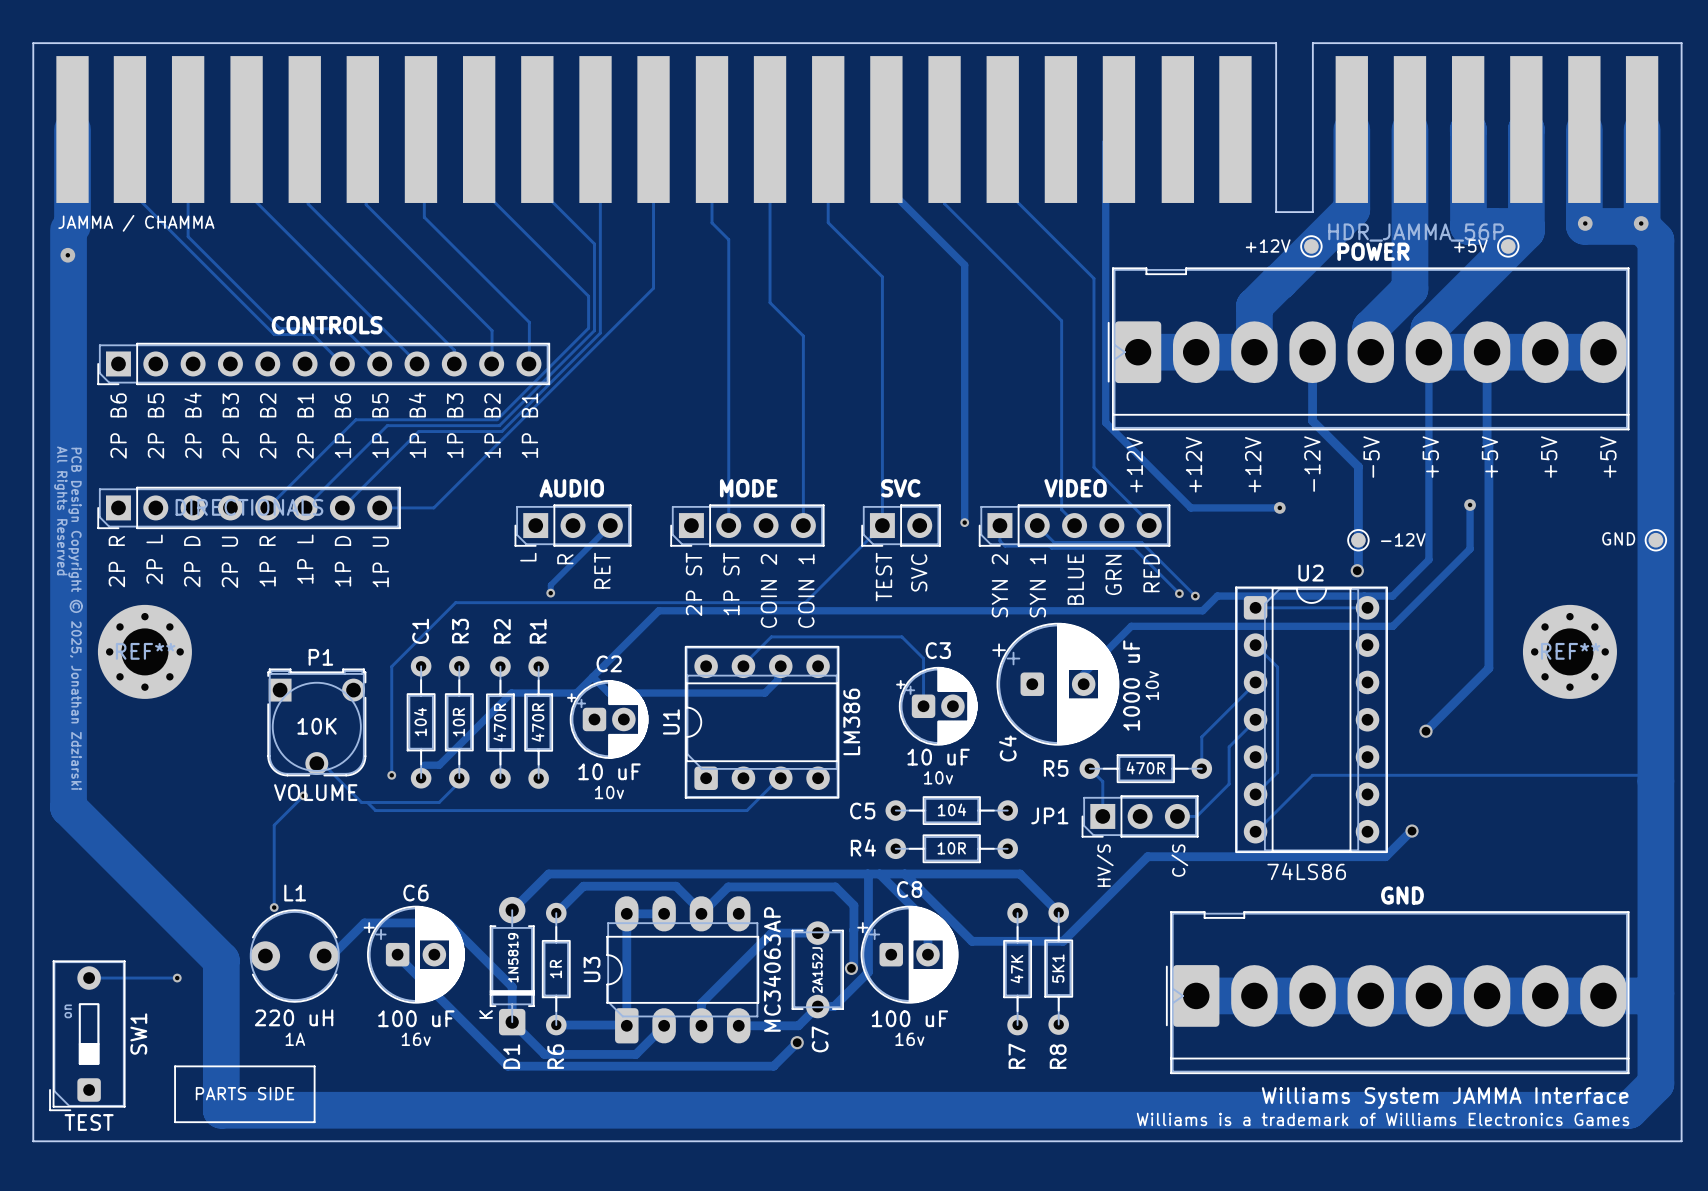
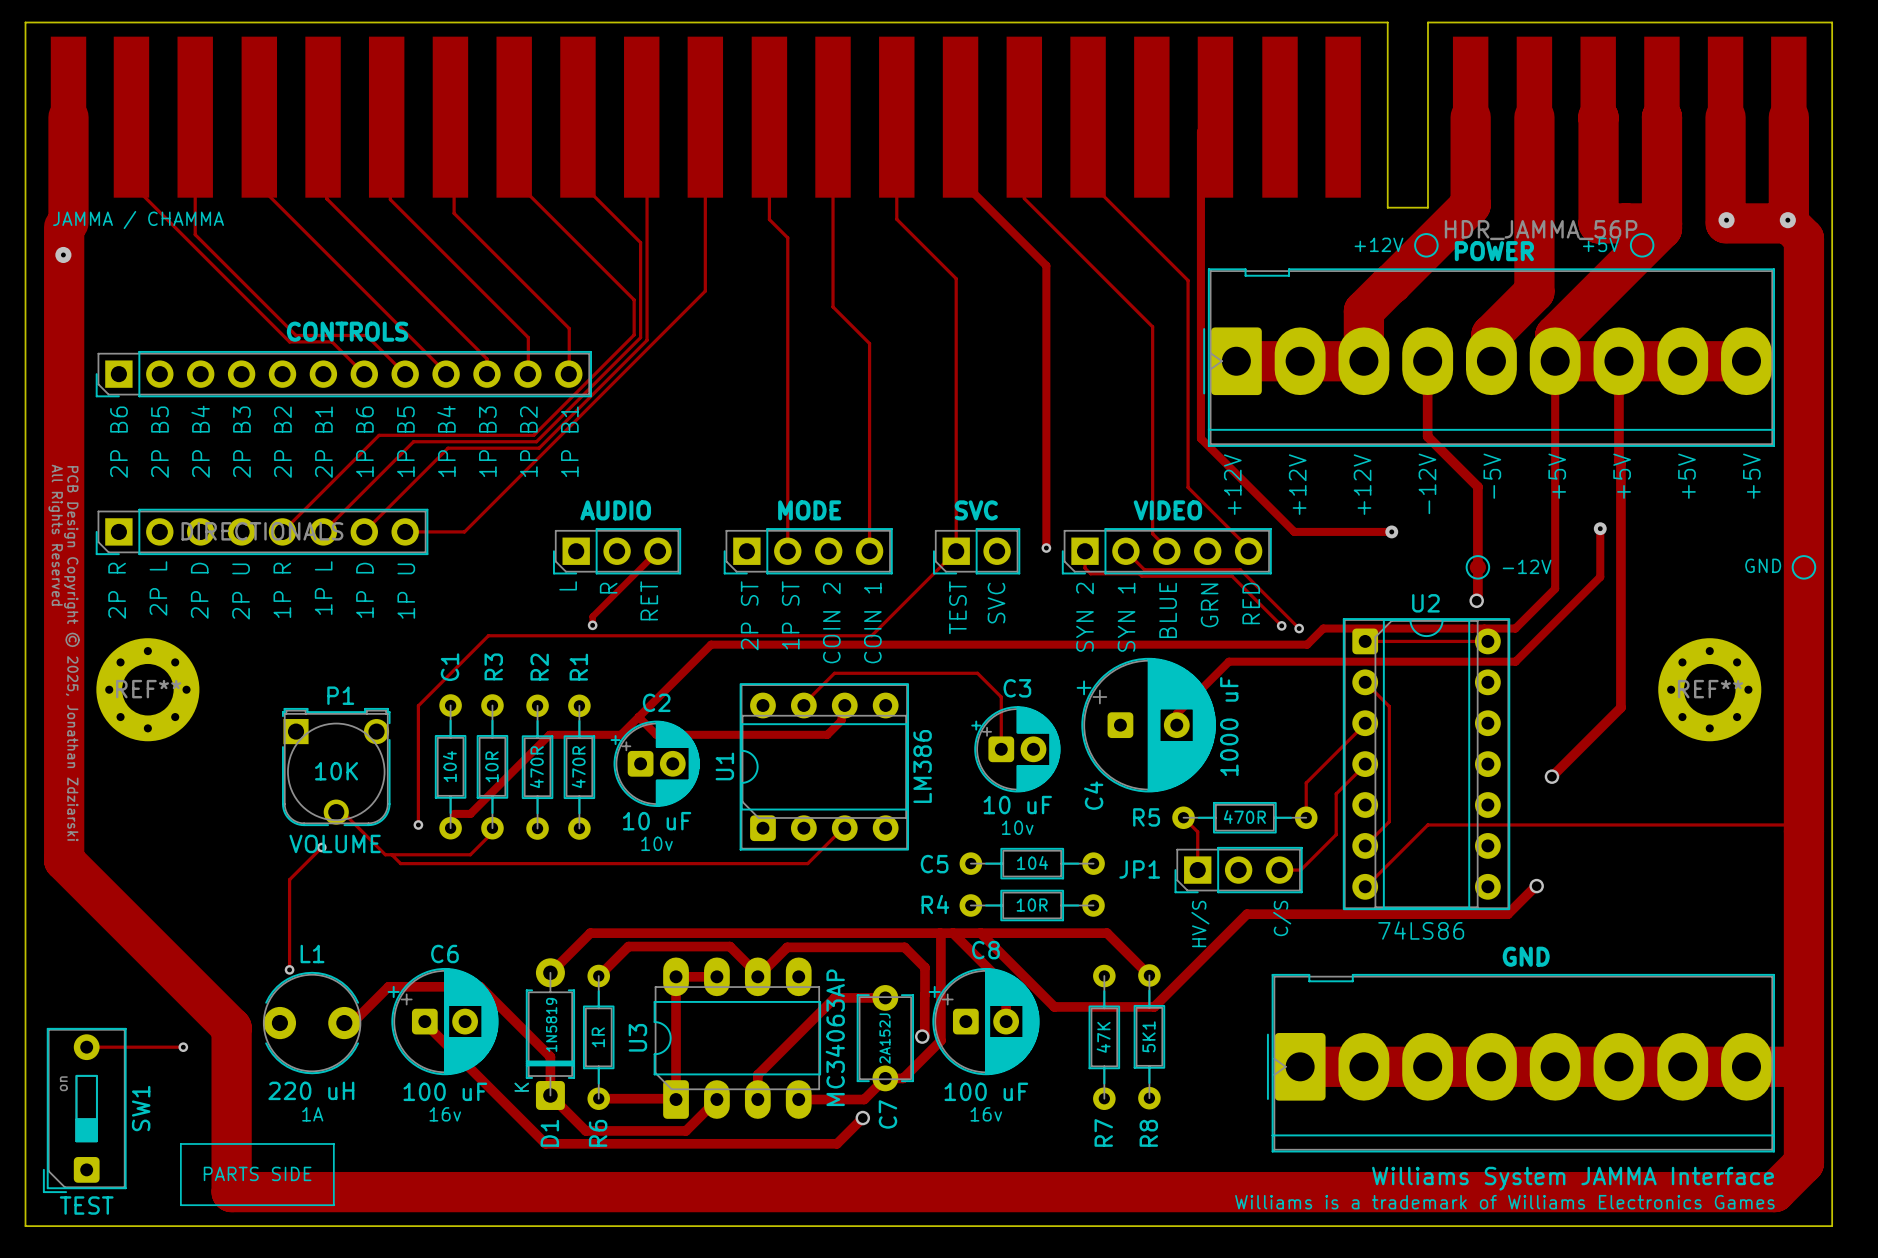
text: 10v (1152, 685) -> none

